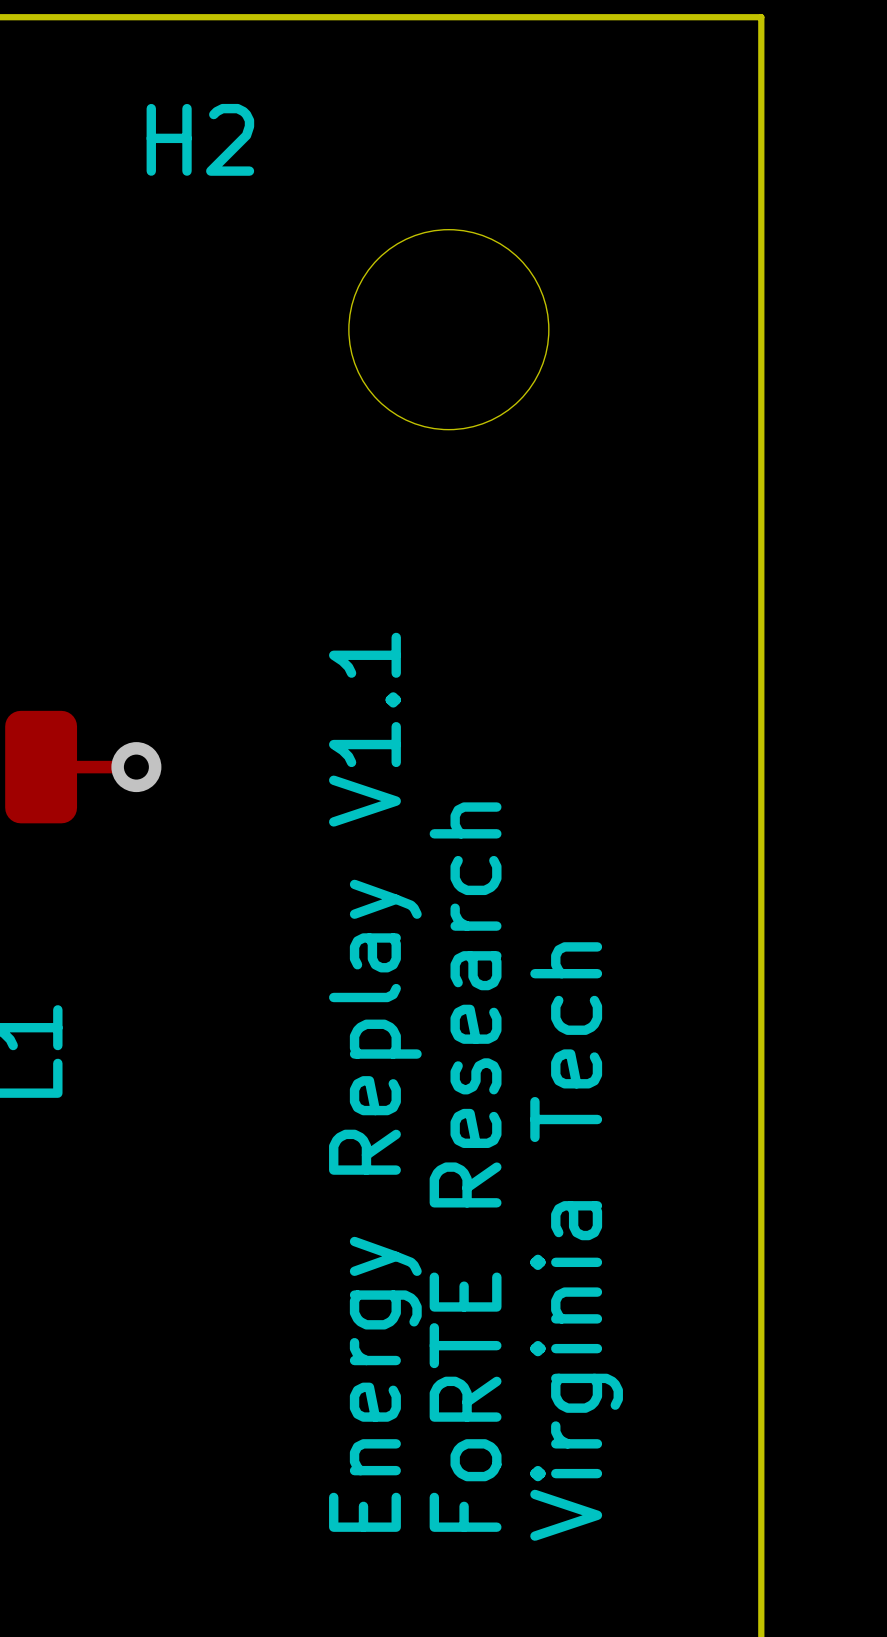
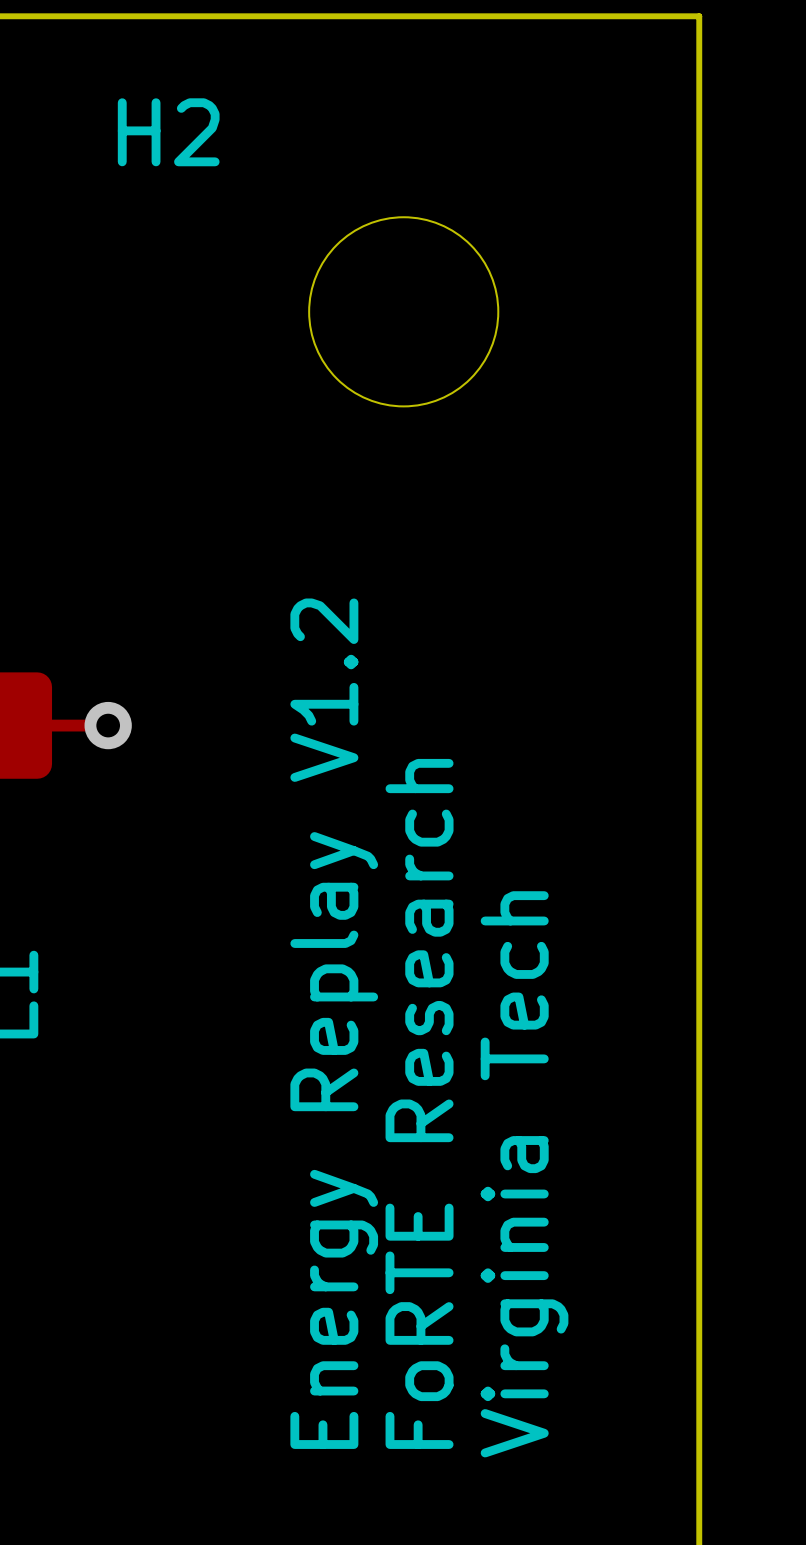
text: Energy Replay V1.1 (375, 1082) -> Energy Replay V1.2 (334, 1023)

